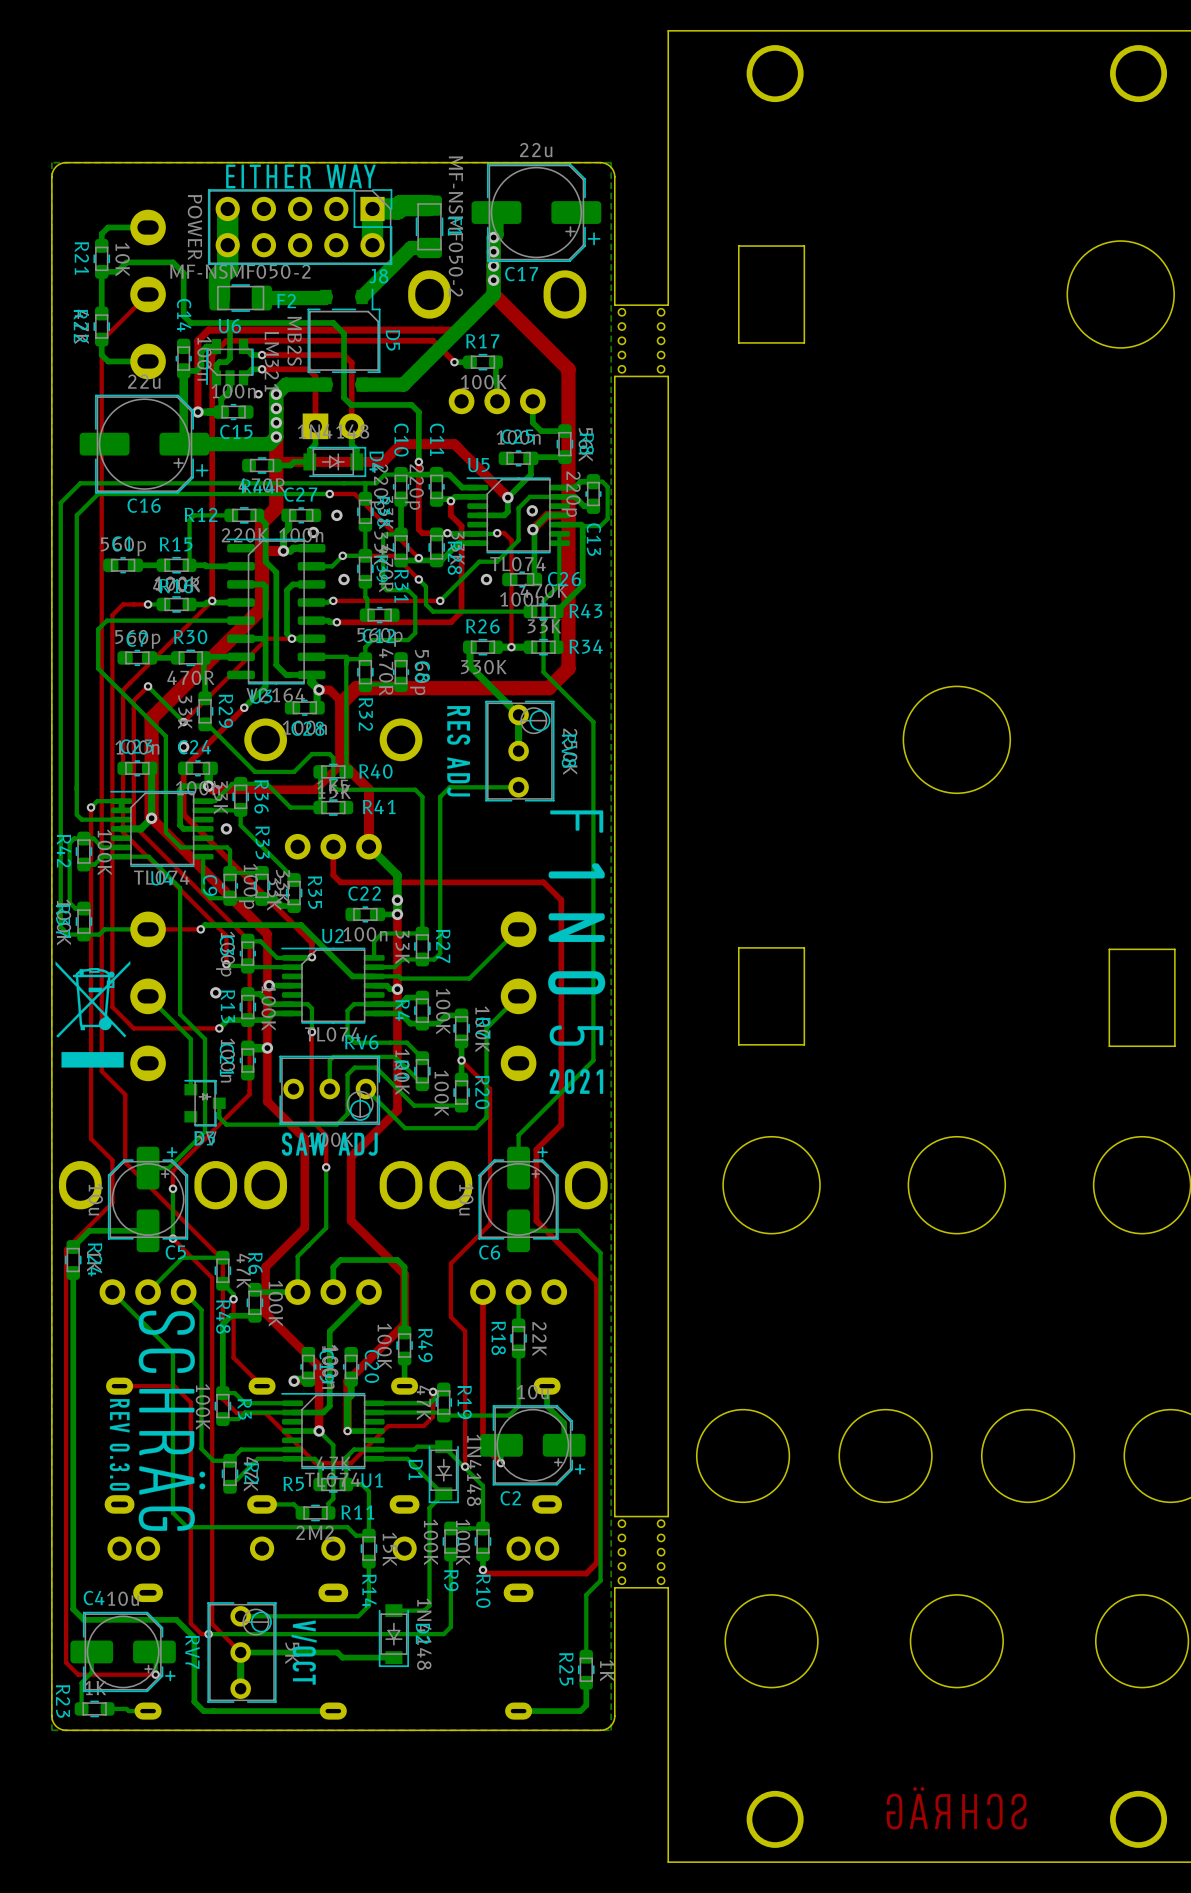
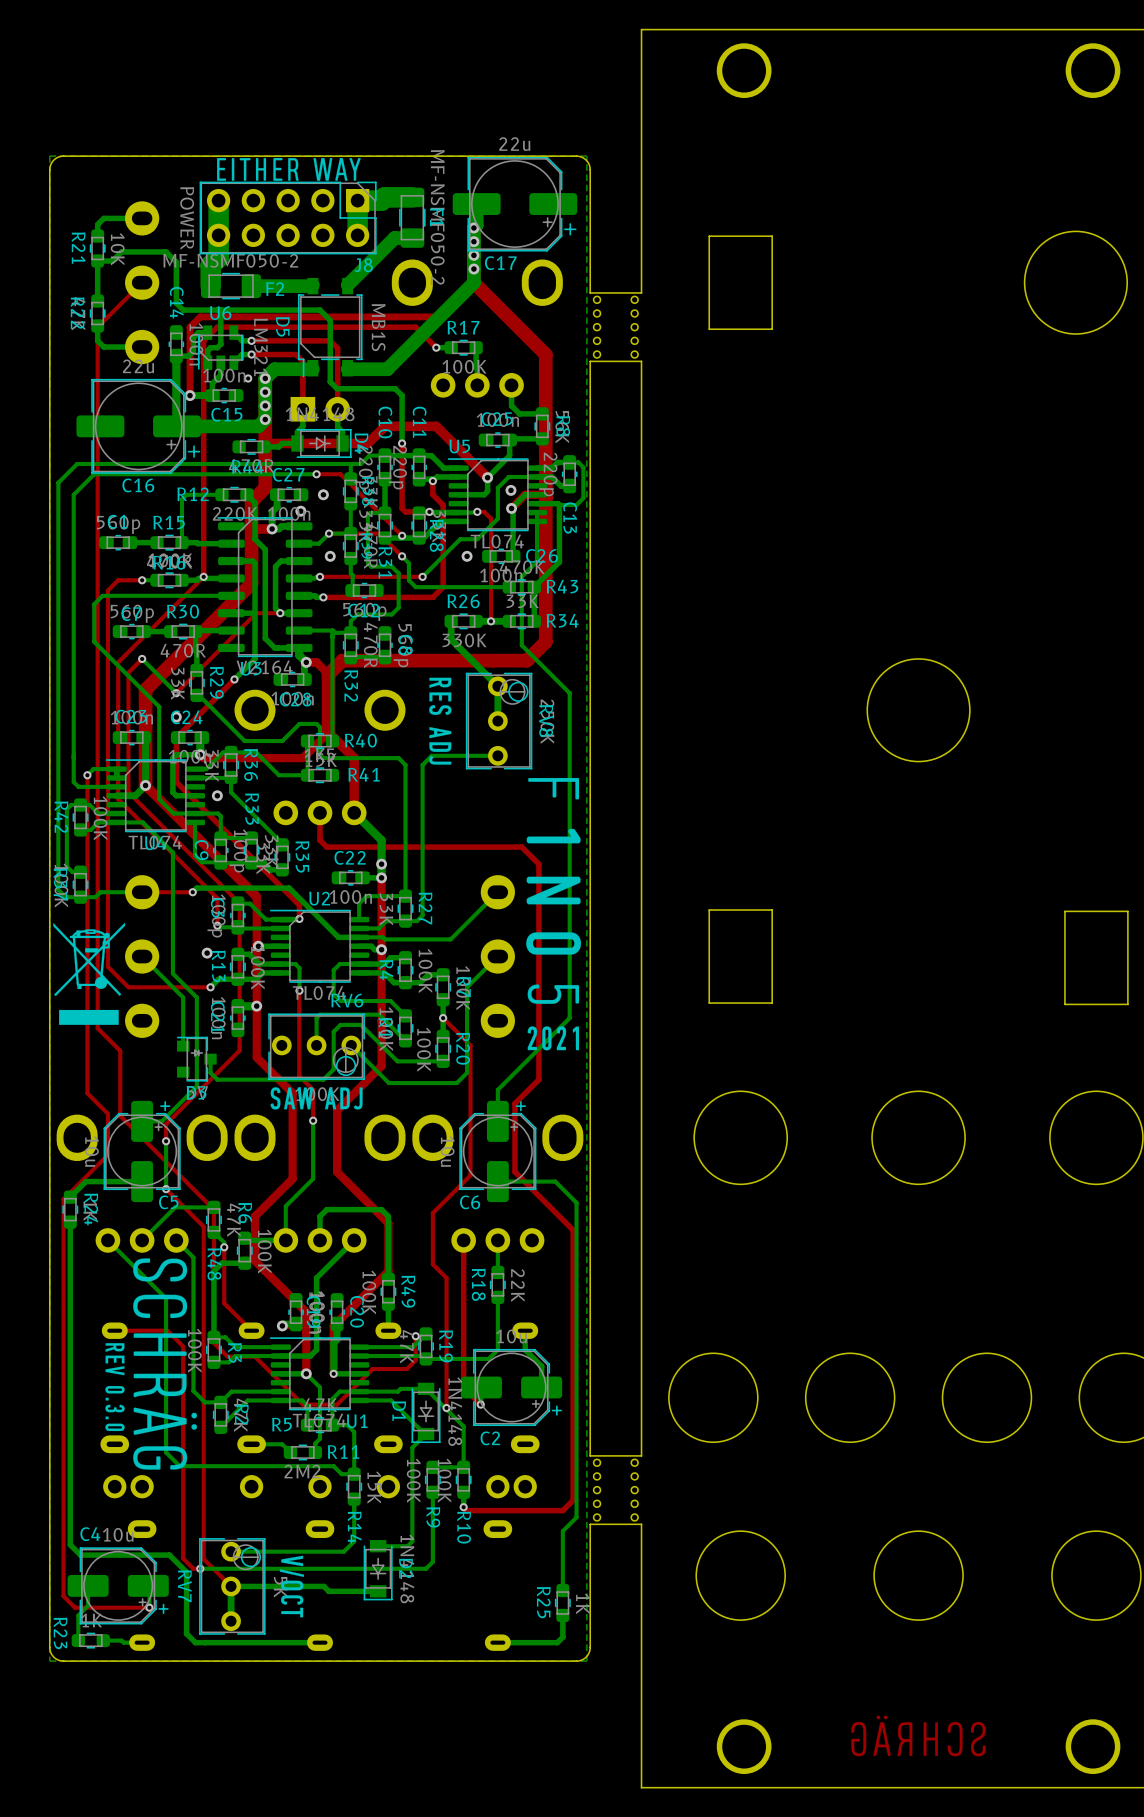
D5 footprint: [307, 288, 381, 392] -> [297, 277, 363, 378]
D5 name position: D5 (392, 340) -> D5 (282, 326)
D5 value: MB2S (294, 341) -> MB1S (378, 327)

